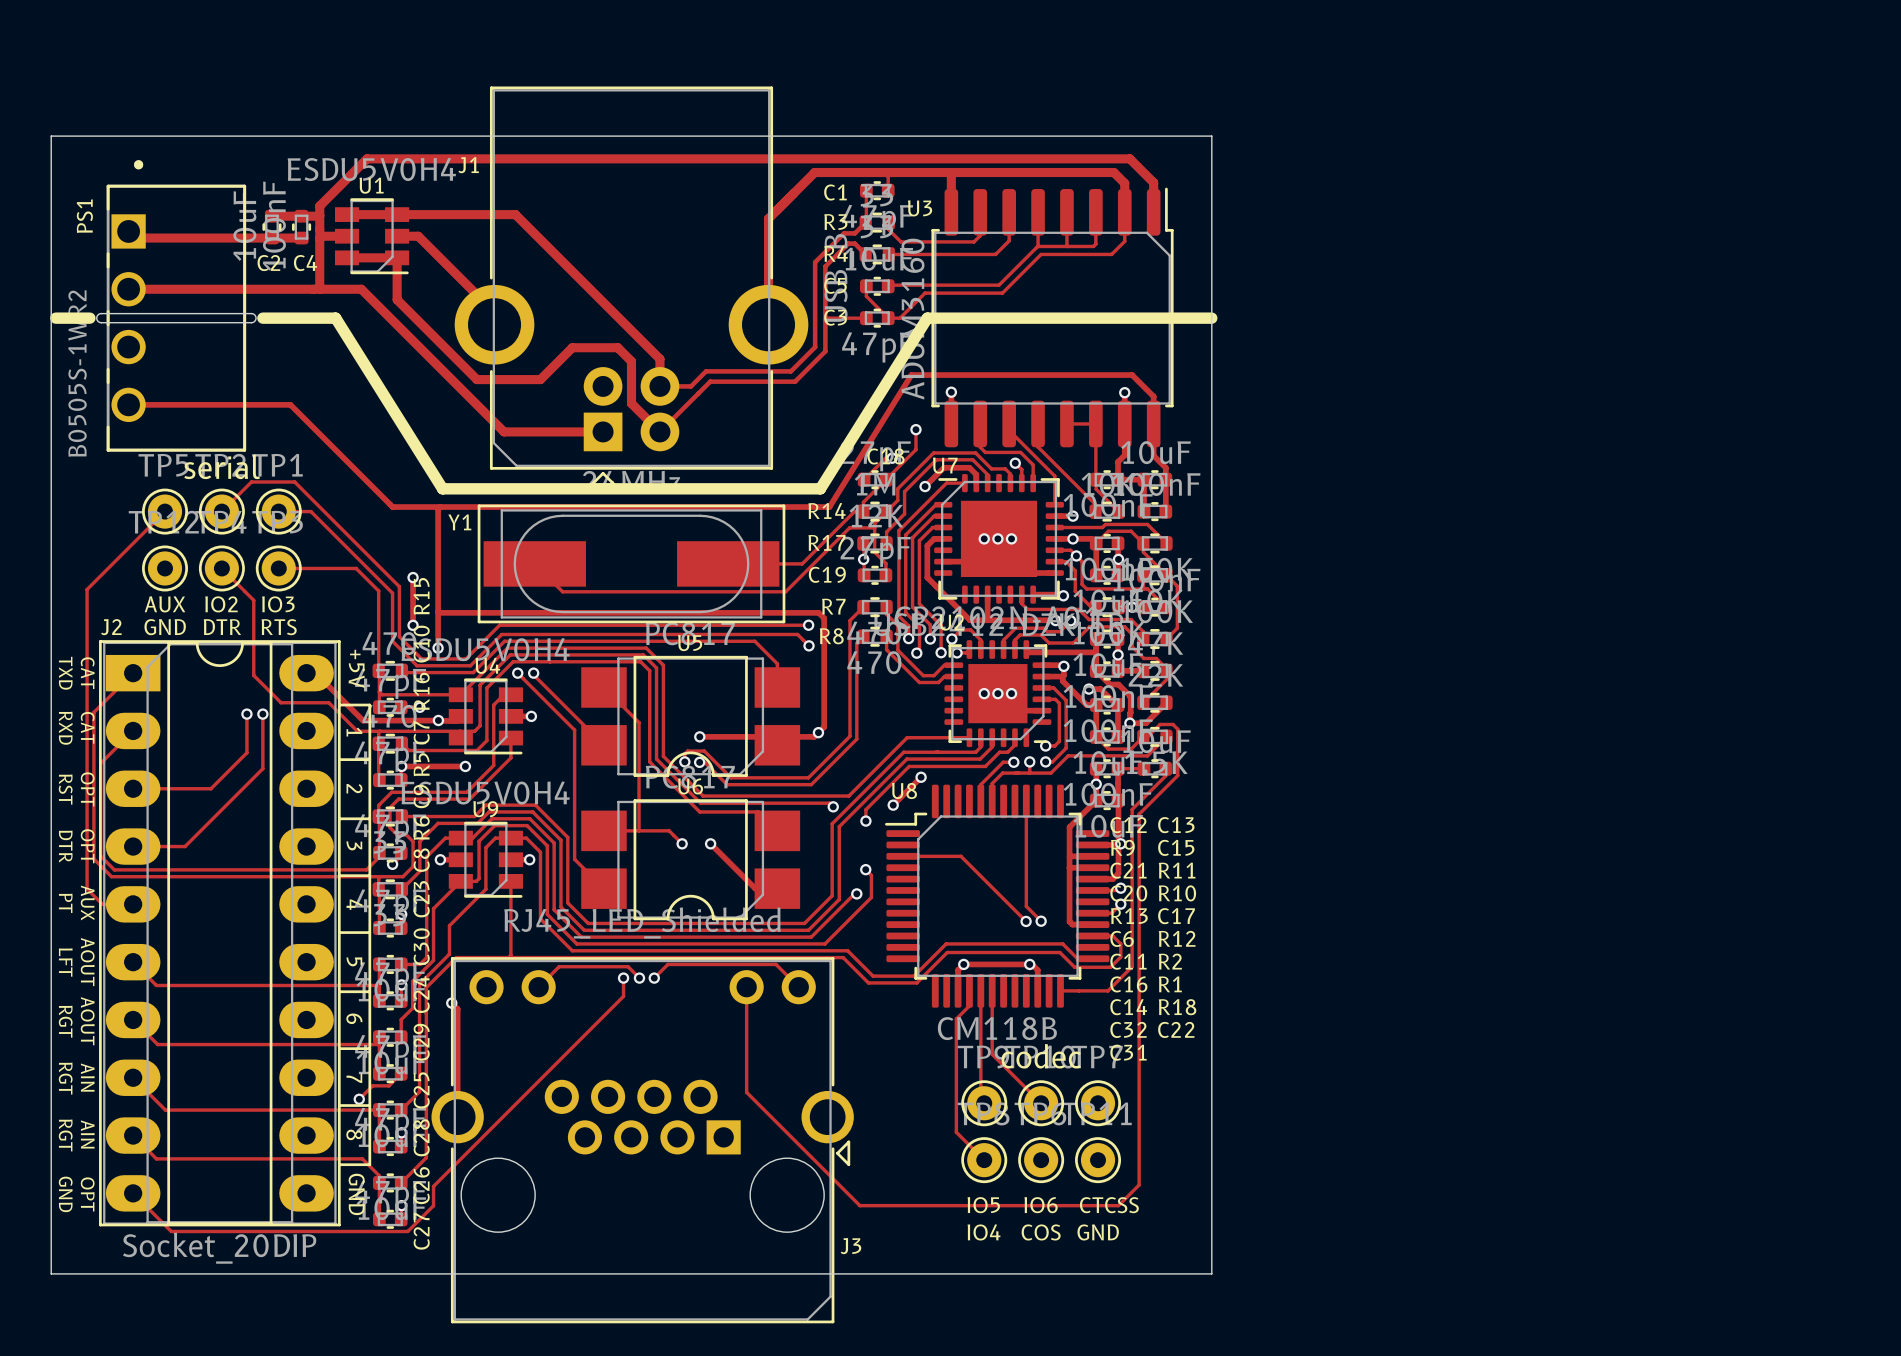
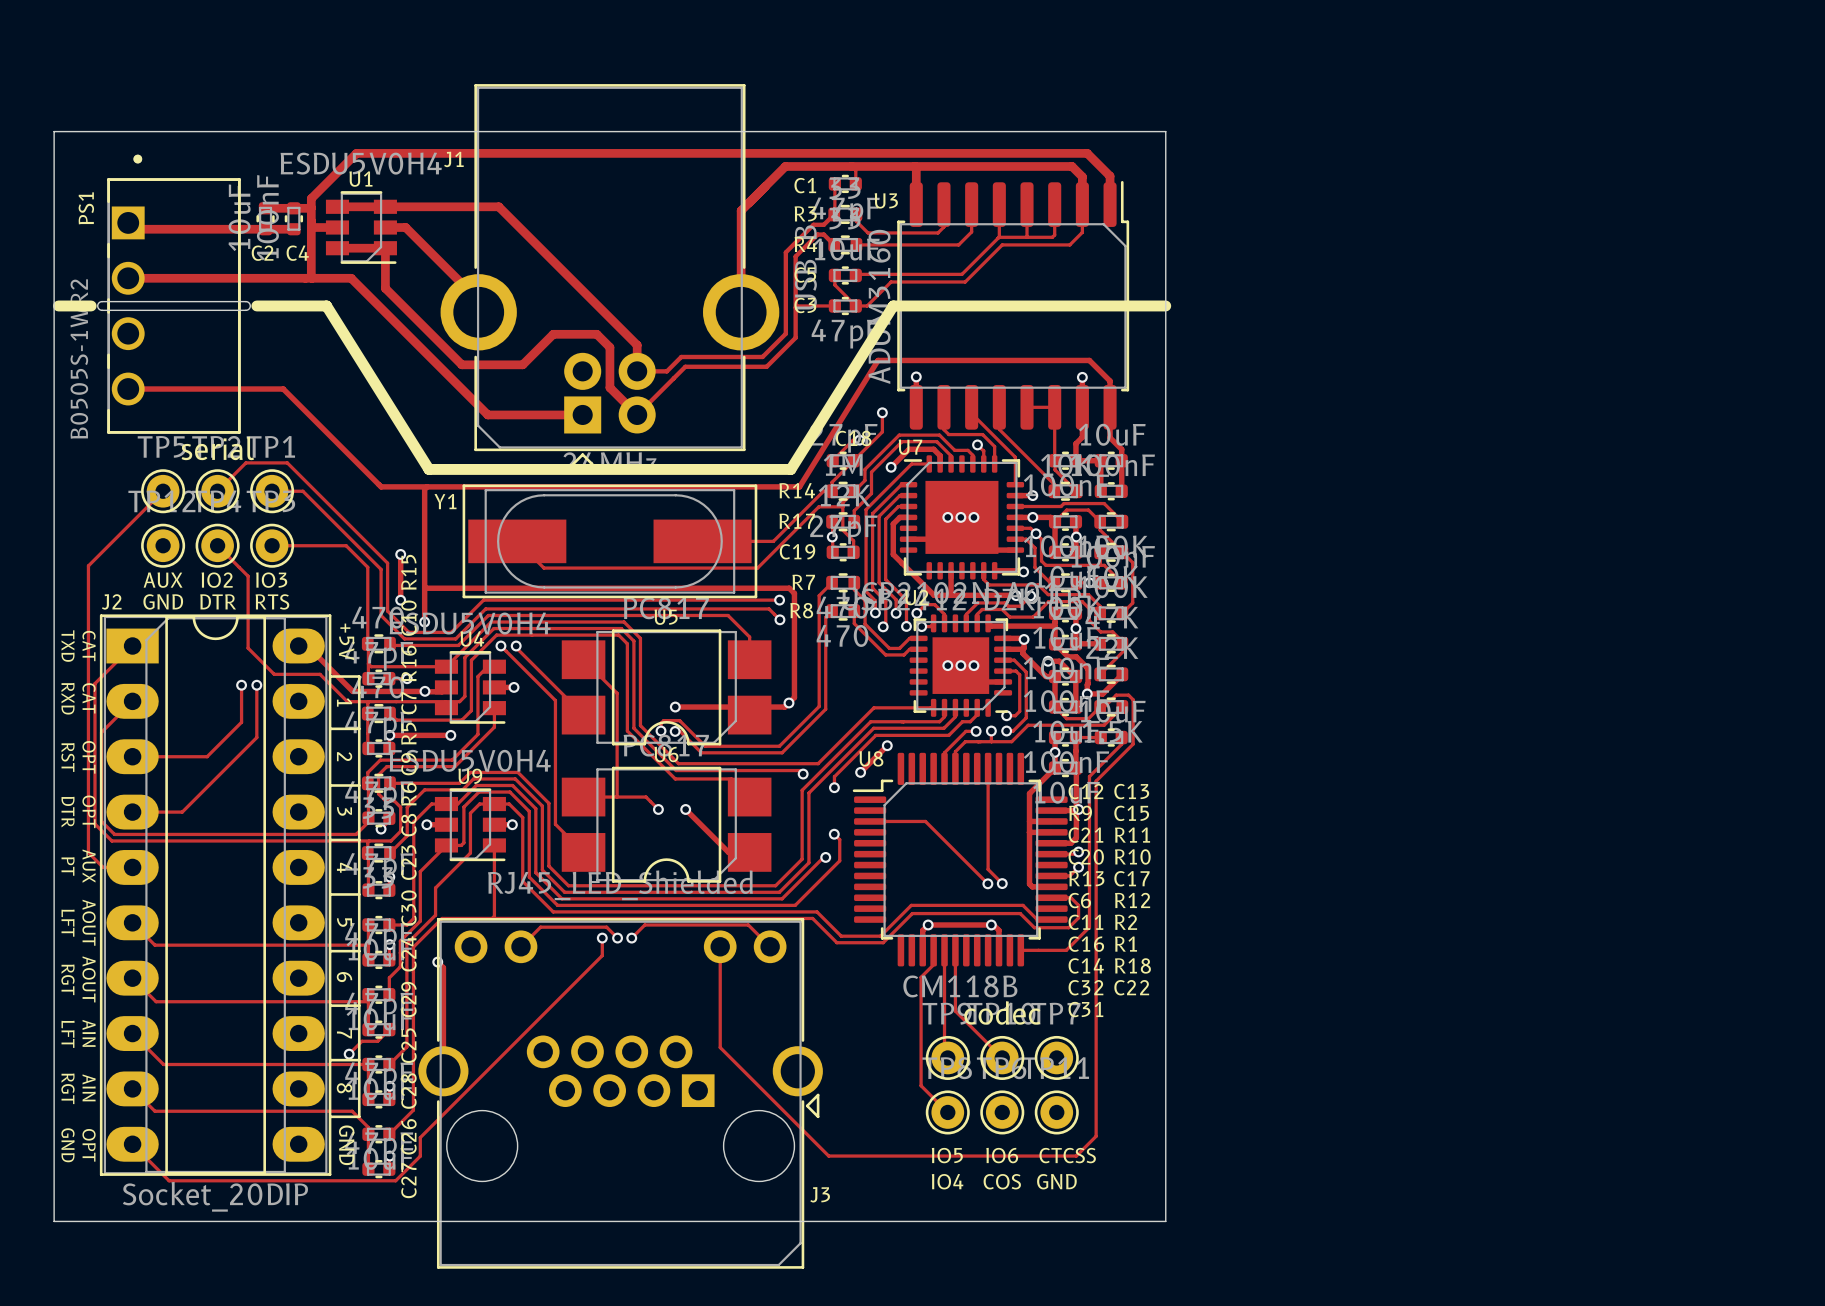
text: RGT (65, 1078) -> LFT (68, 1034)

